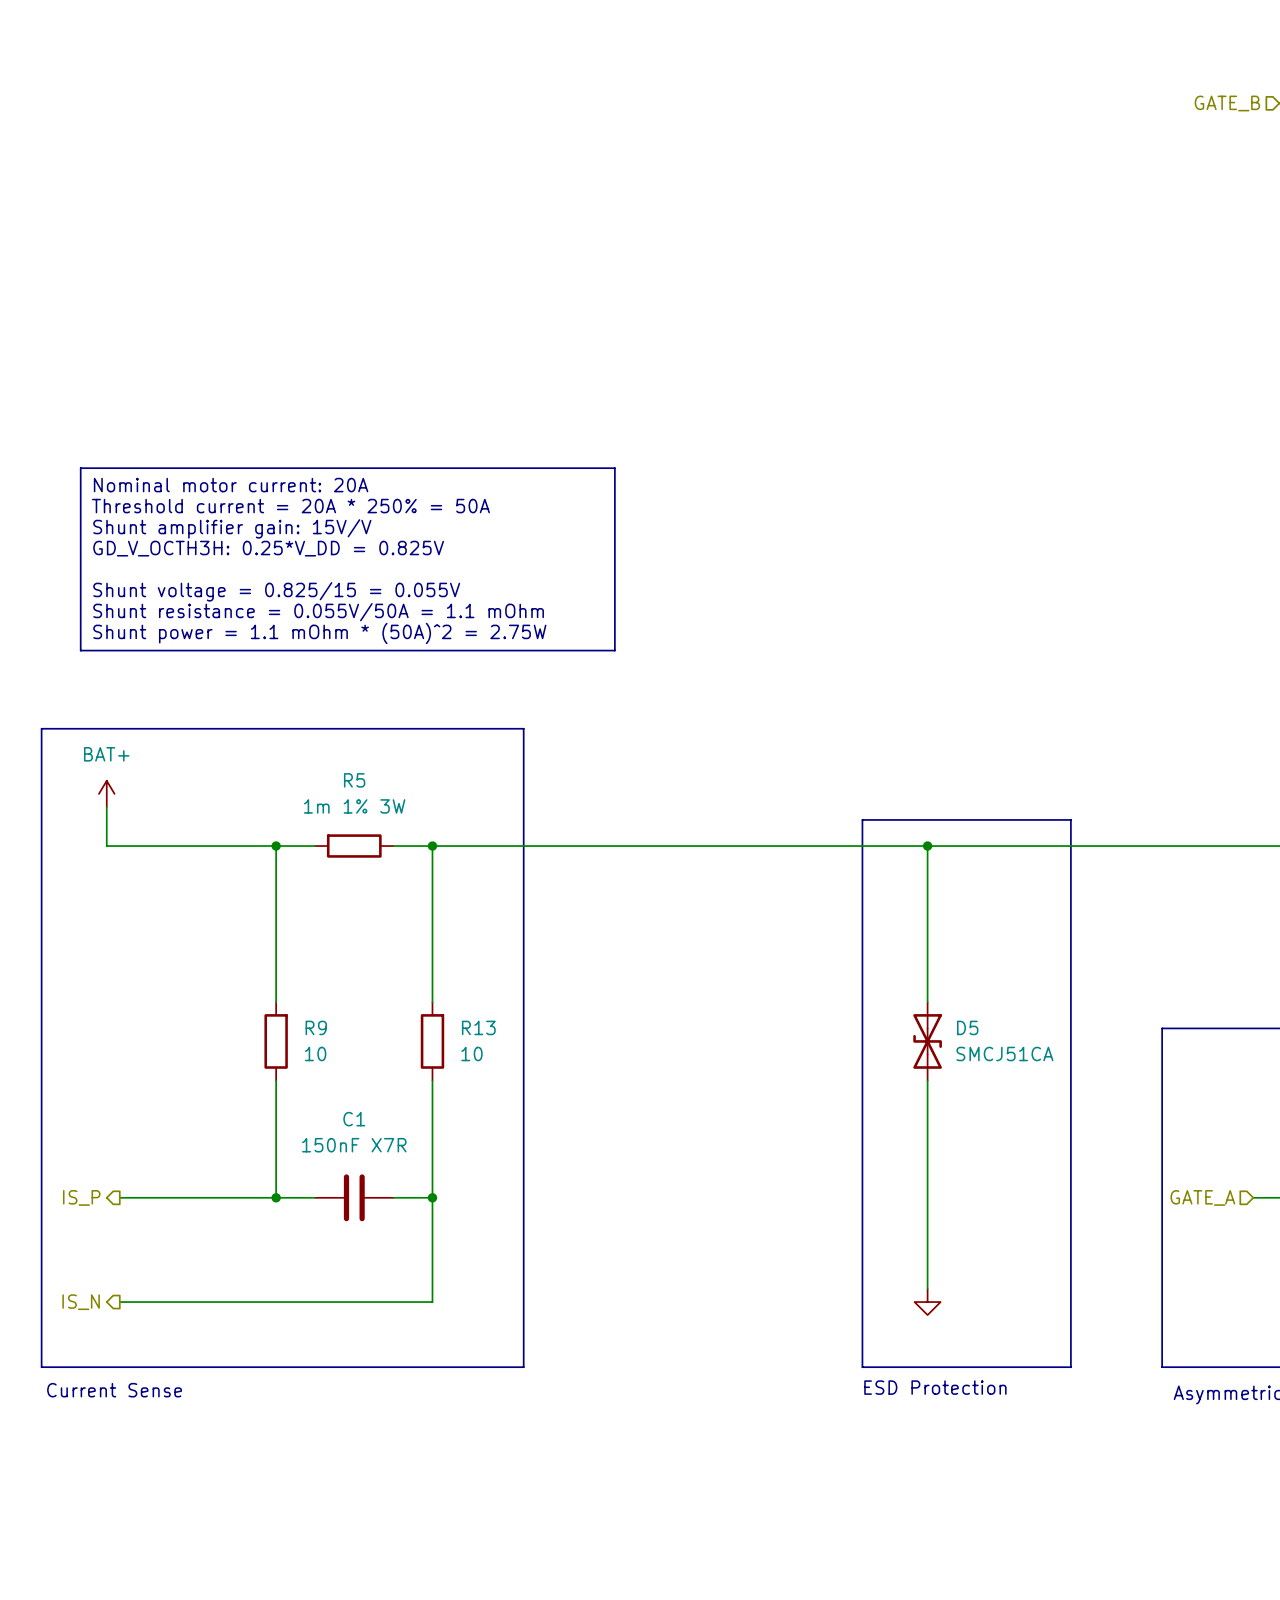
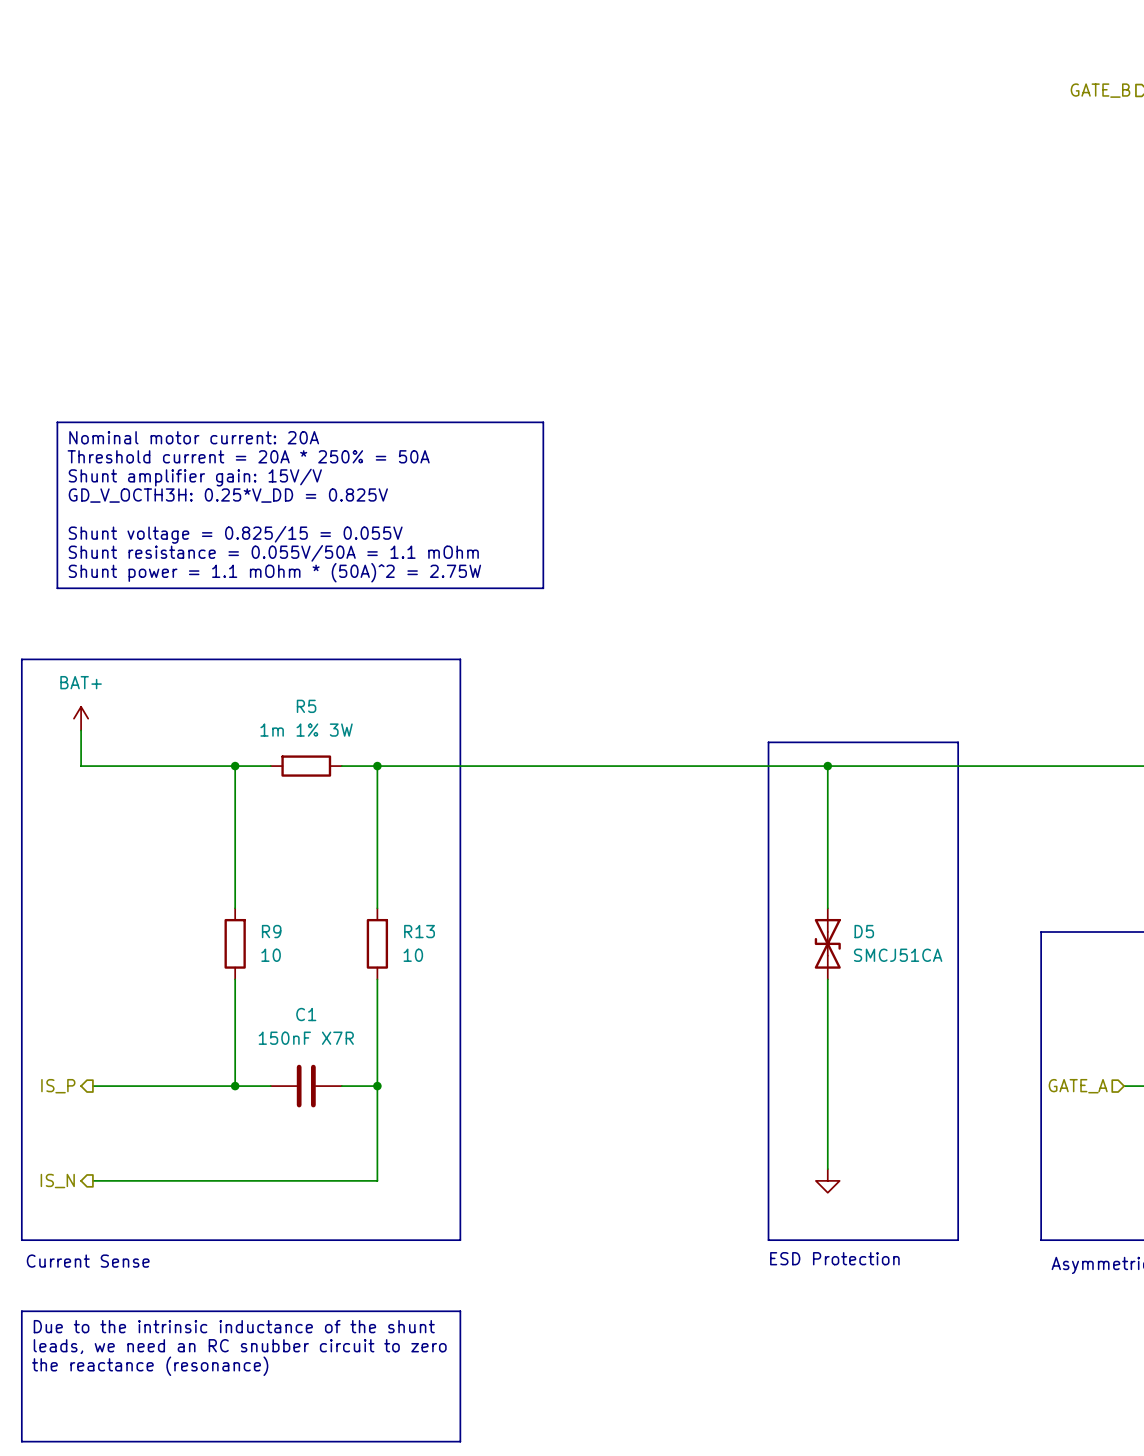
line: none -> (21, 1311) (460, 1311) (460, 1441) (21, 1441) (21, 1311)
text: none -> Due to the intrinsic inductance of the shunt (234, 1326)
text: none -> leads, we need an RC snubber circuit to zero (240, 1346)
text: none -> the reactance (resonance) (150, 1366)

